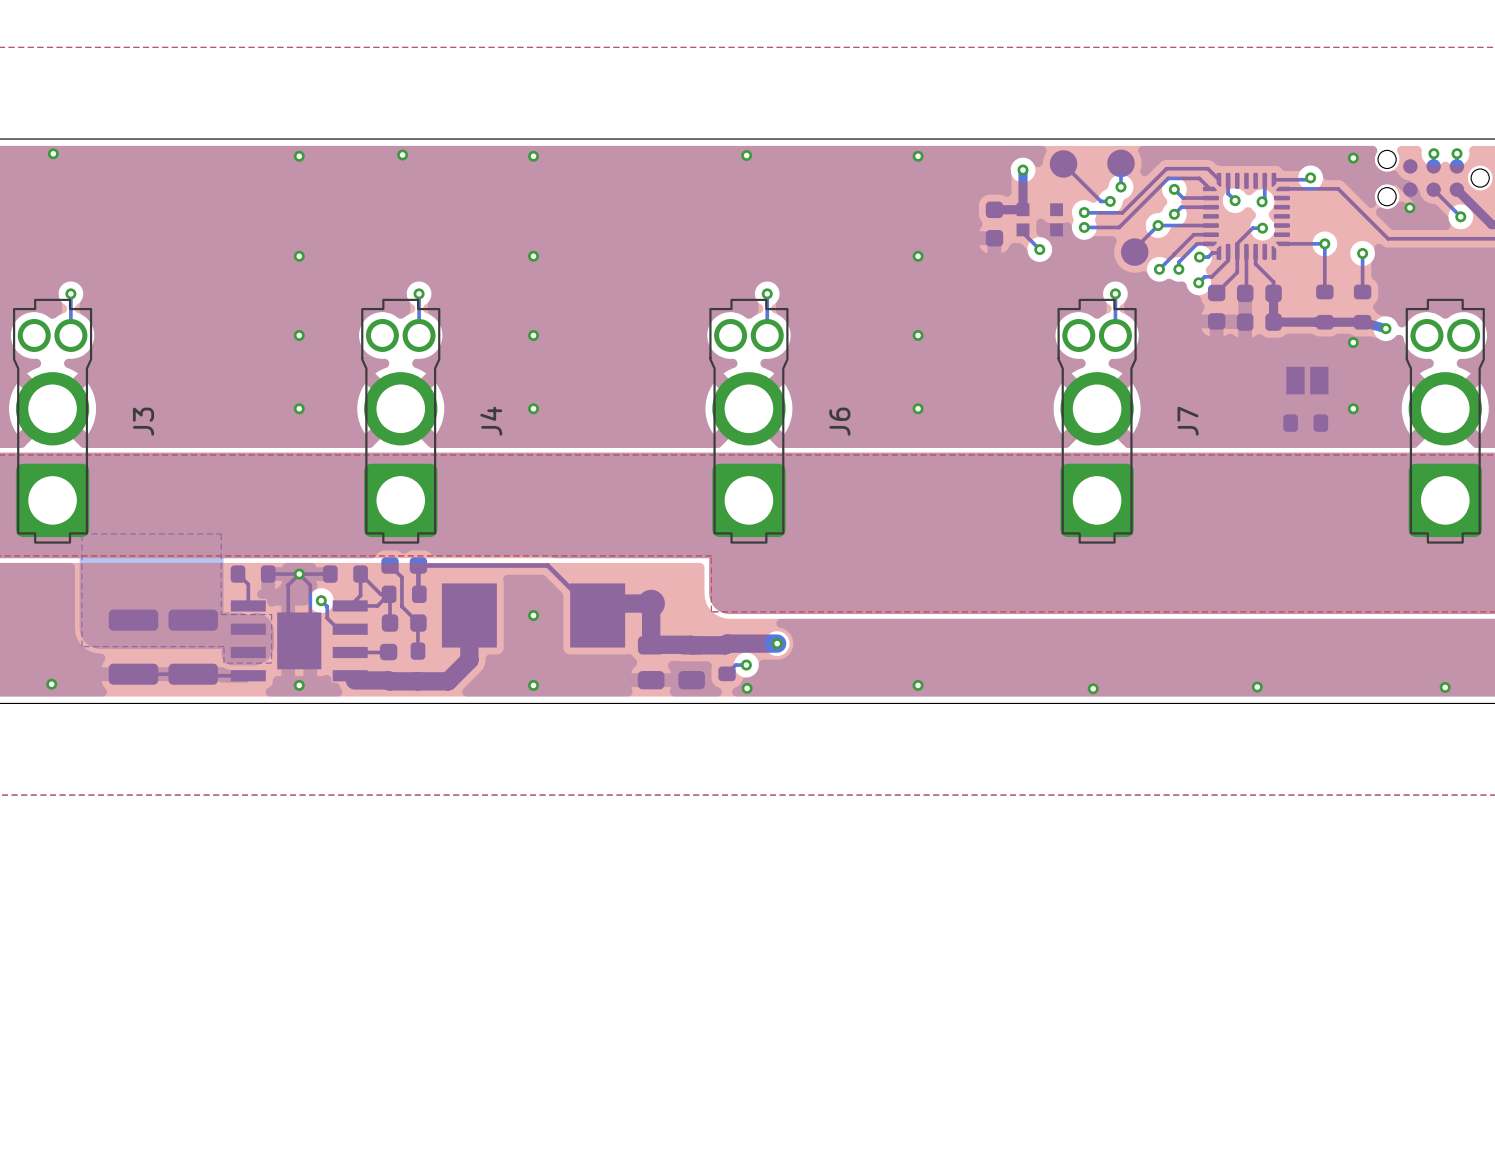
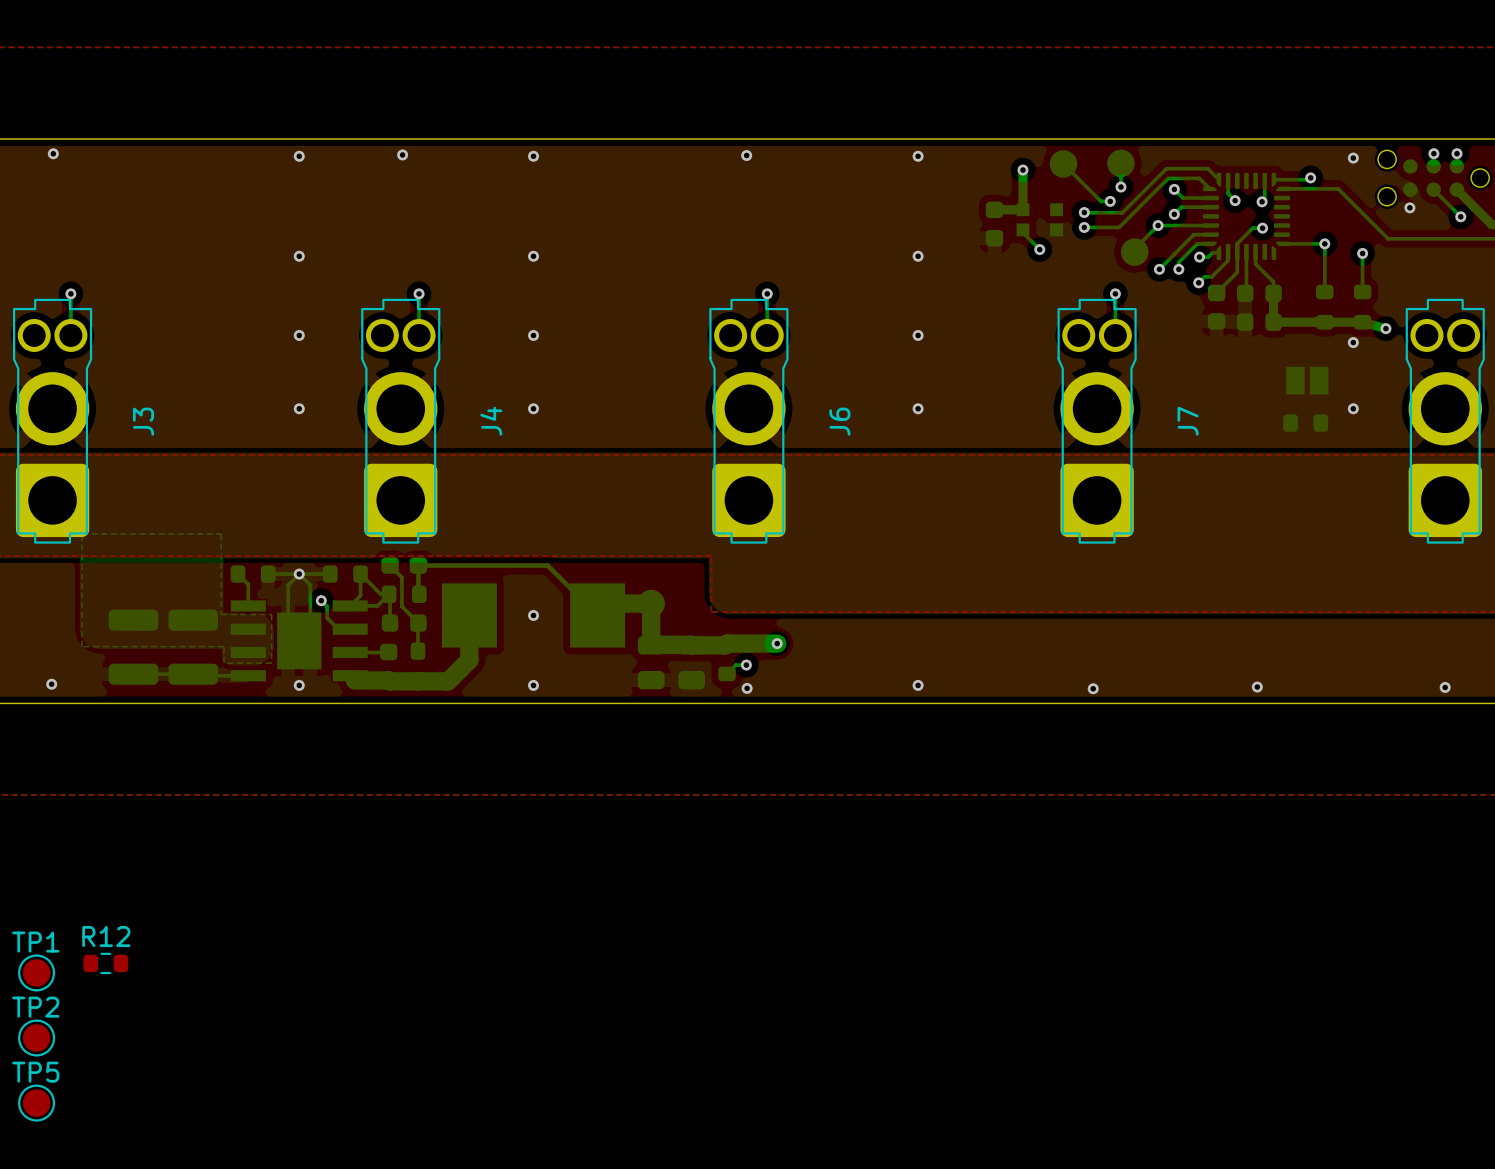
R12: none -> (105, 963)
TP1: none -> (36, 972)
TP2: none -> (36, 1038)
TP5: none -> (36, 1103)

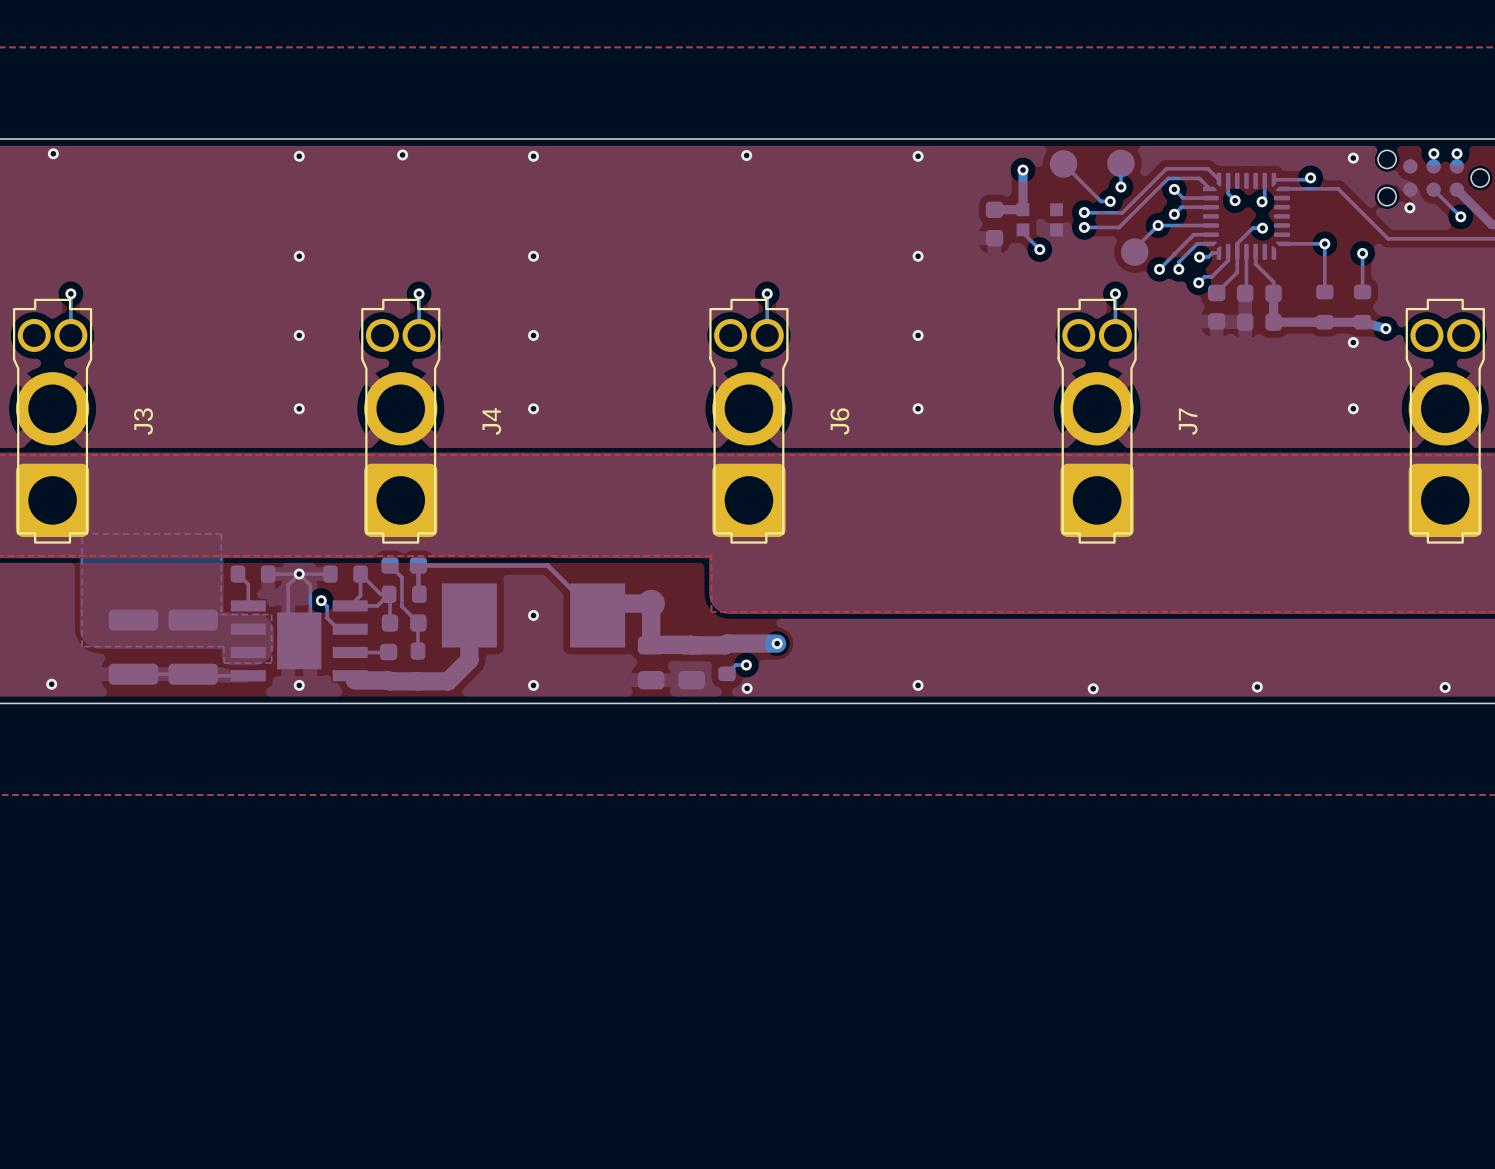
part: (1307, 380) -> none
part: (1305, 423) -> none
R12: (105, 963) -> none
TP1: (36, 972) -> none
TP2: (36, 1038) -> none
TP5: (36, 1103) -> none

